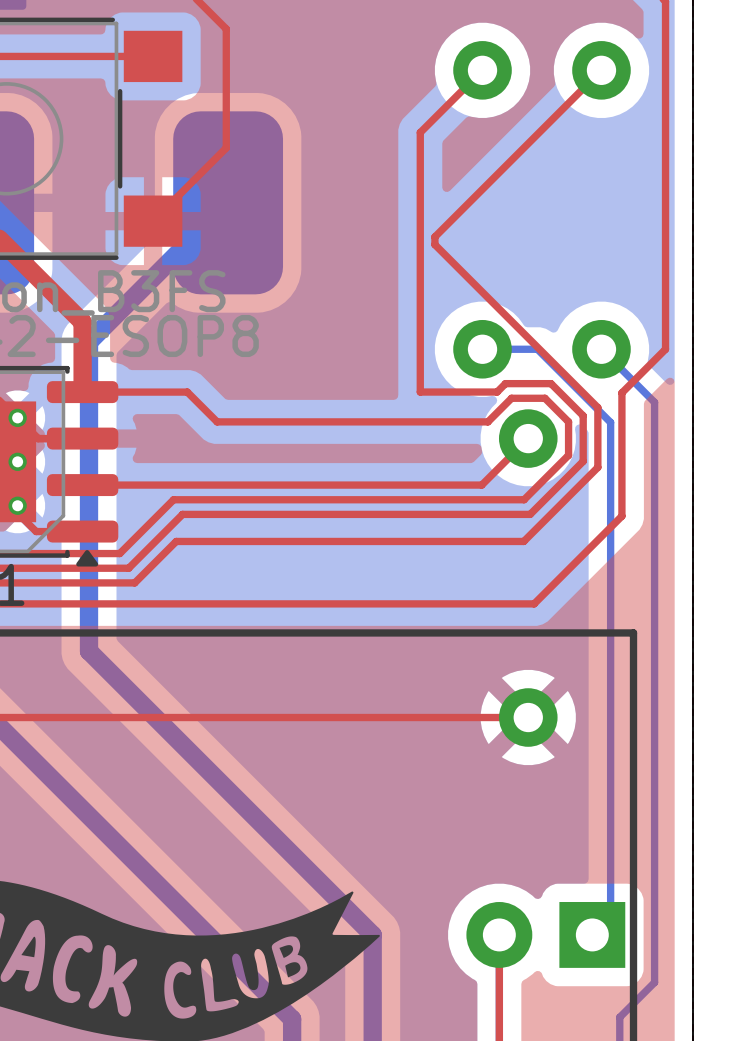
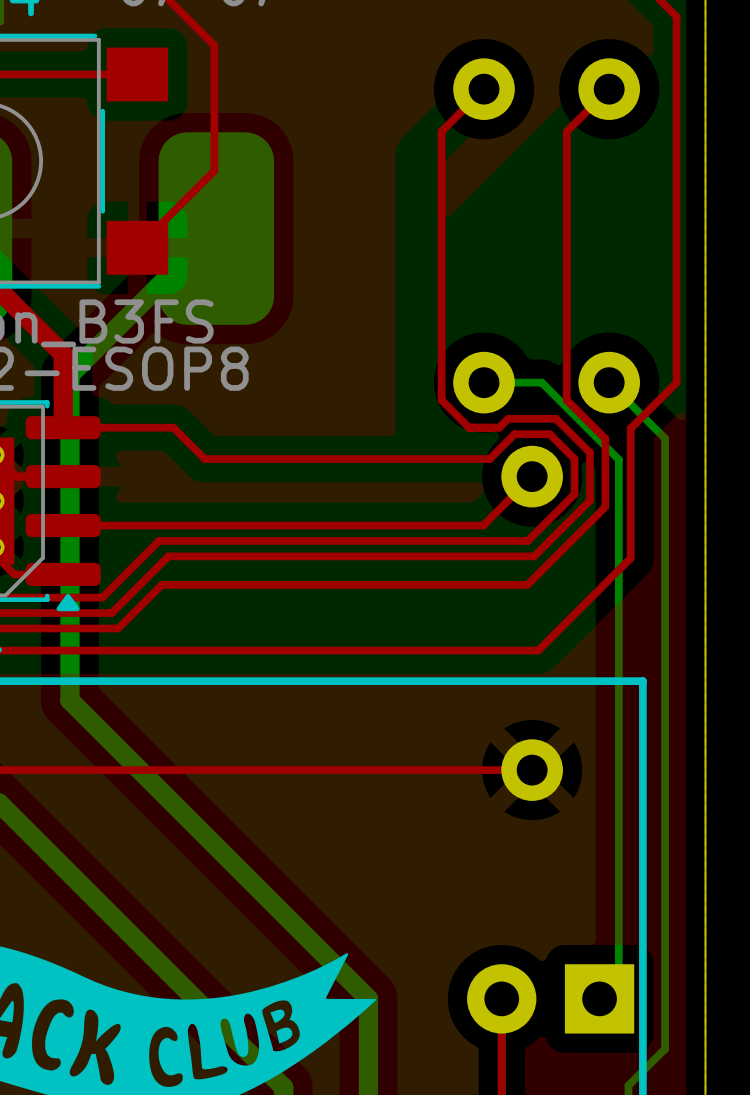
top track: (442, 110) (420, 132) (420, 392) (468, 392) -> (441, 131) (441, 400) (469, 427)
top track: (561, 110) (434, 236) (434, 244) (597, 407) -> (566, 131) (566, 400) (605, 438) (605, 444)

